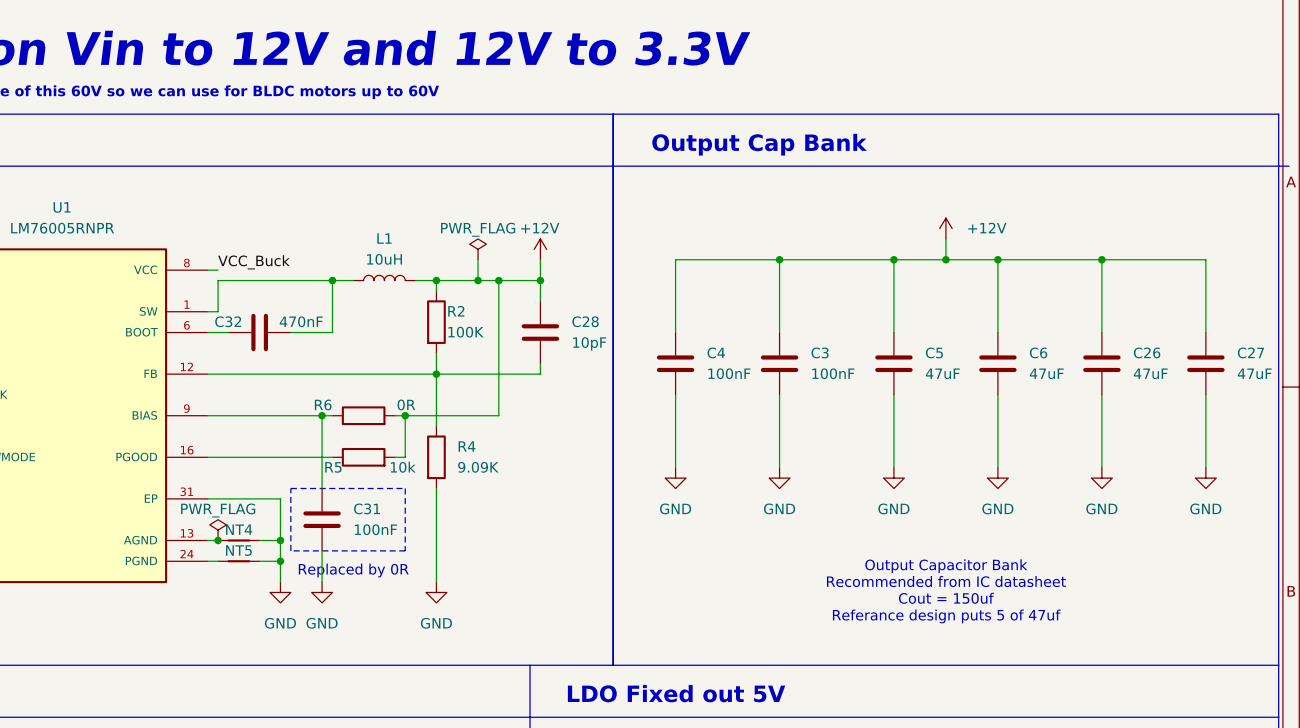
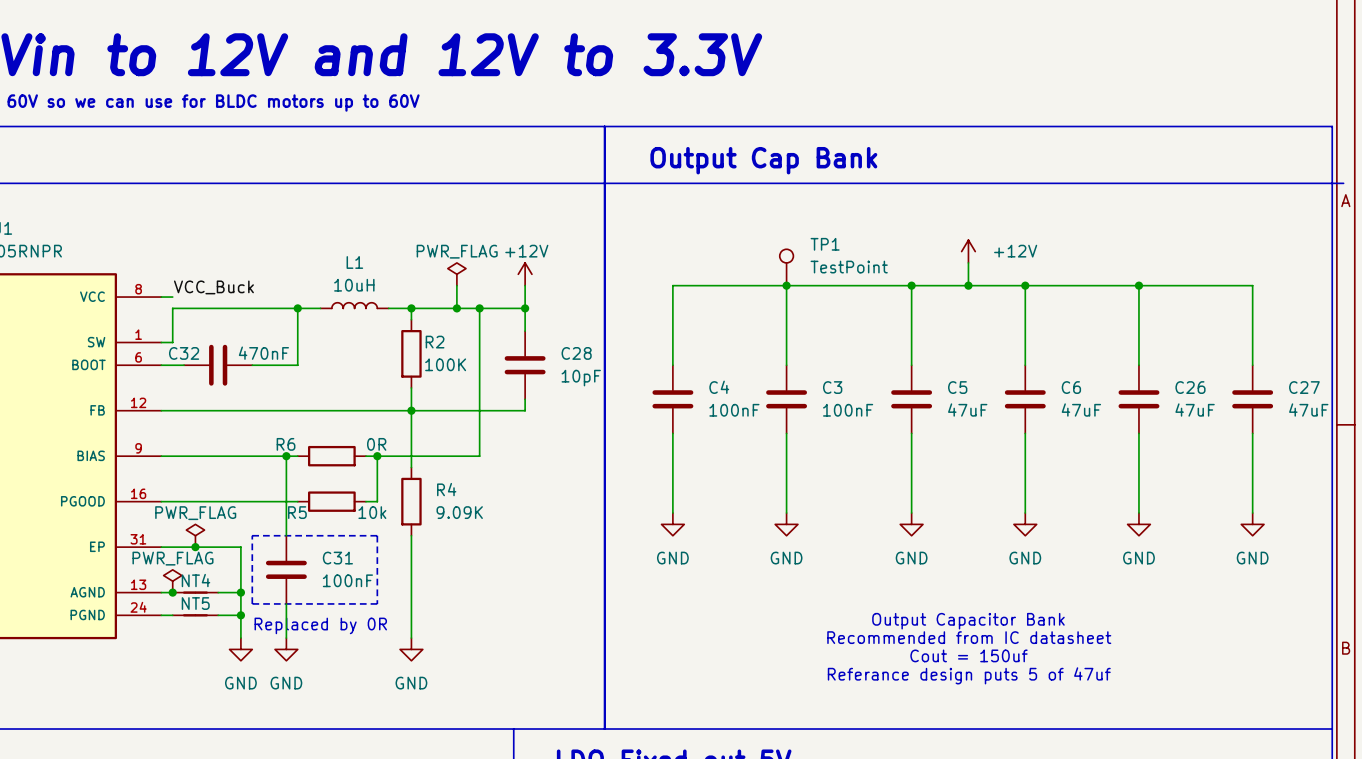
TP1: none -> TestPoint (786, 267)
power symbol: none -> PWR_FLAG (195, 535)
junction: none -> (195, 547)

